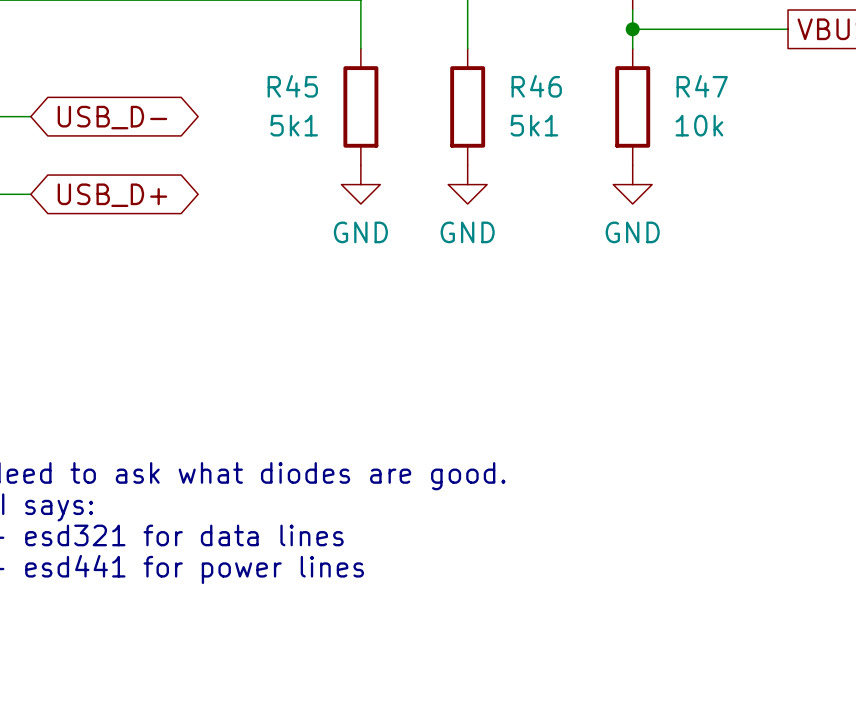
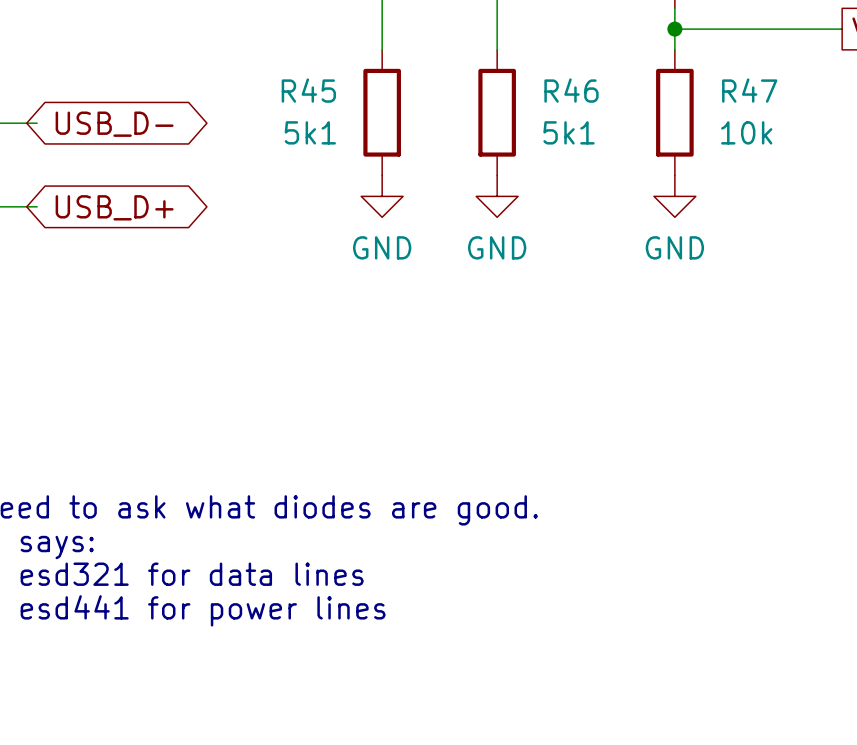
wire: none -> (26, 123) (37, 123)
wire: none -> (26, 206) (37, 206)

